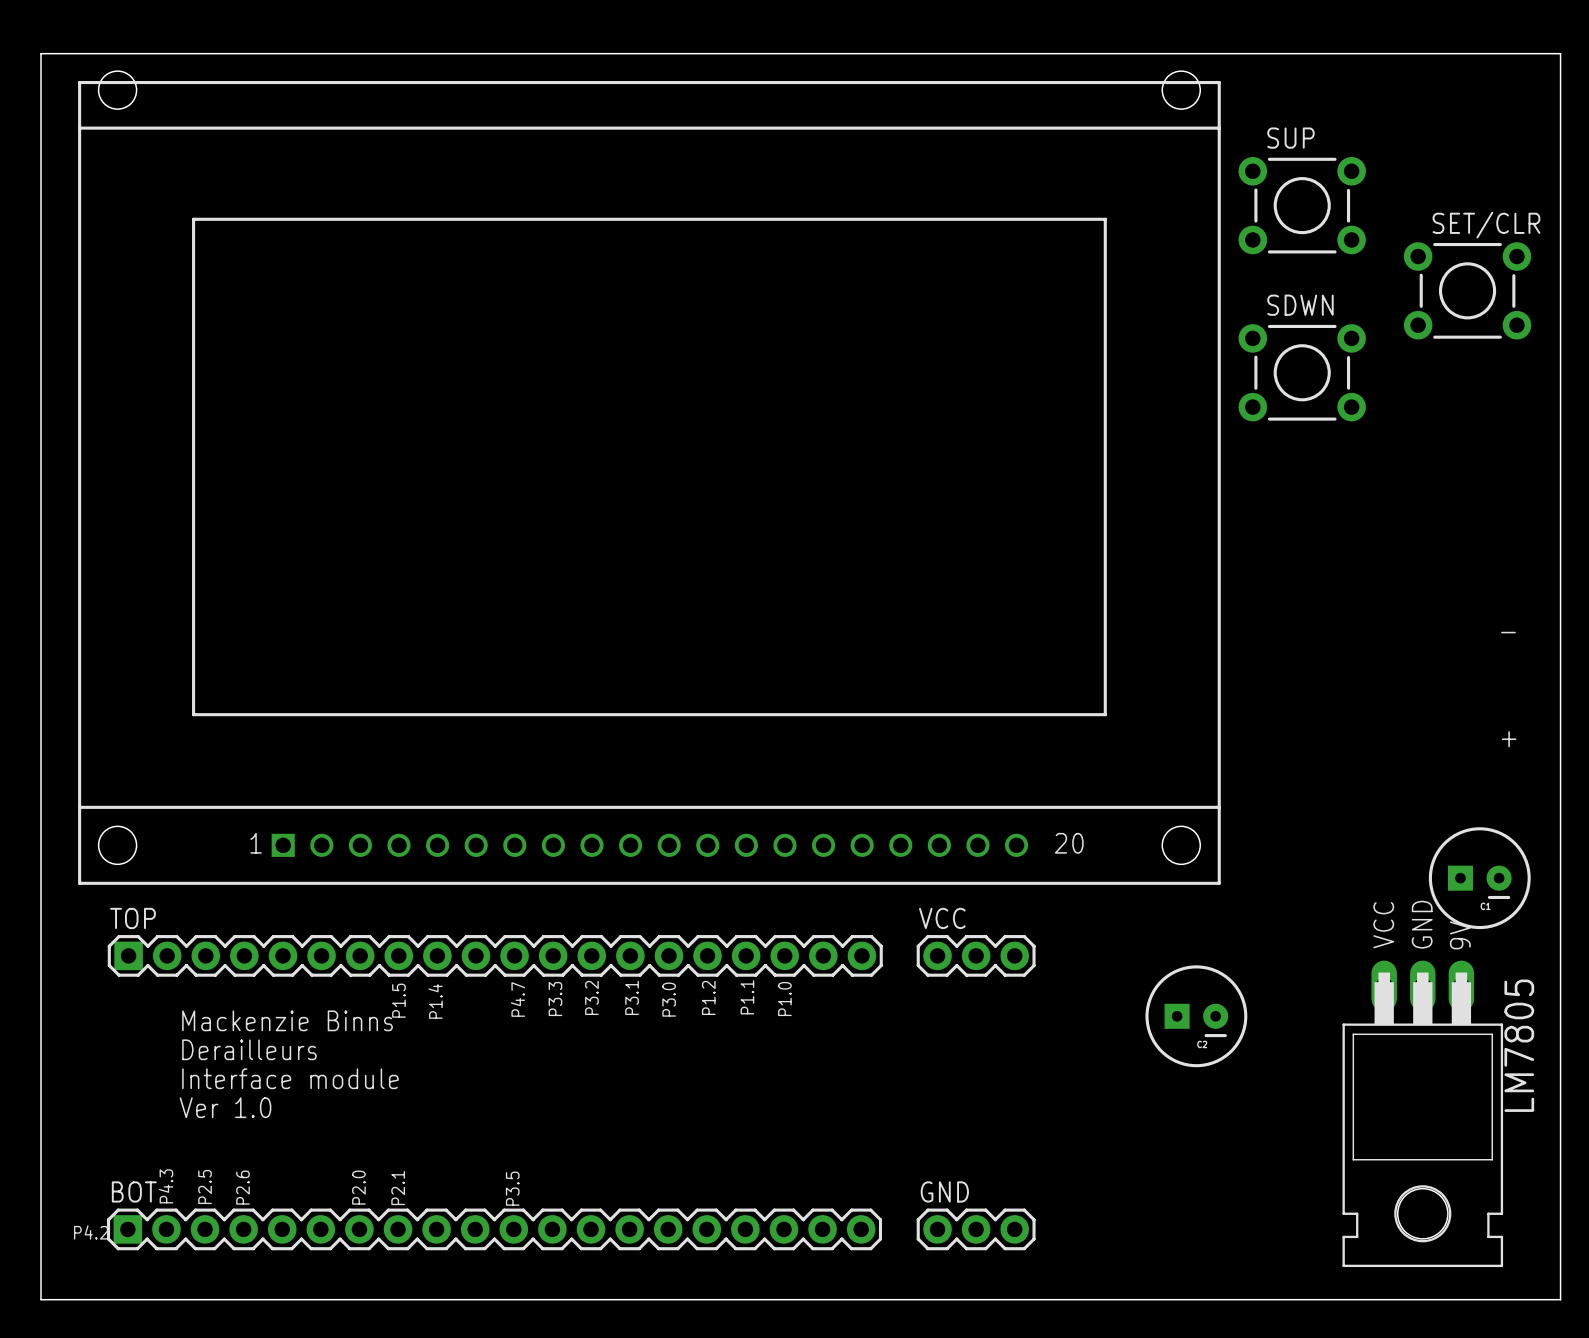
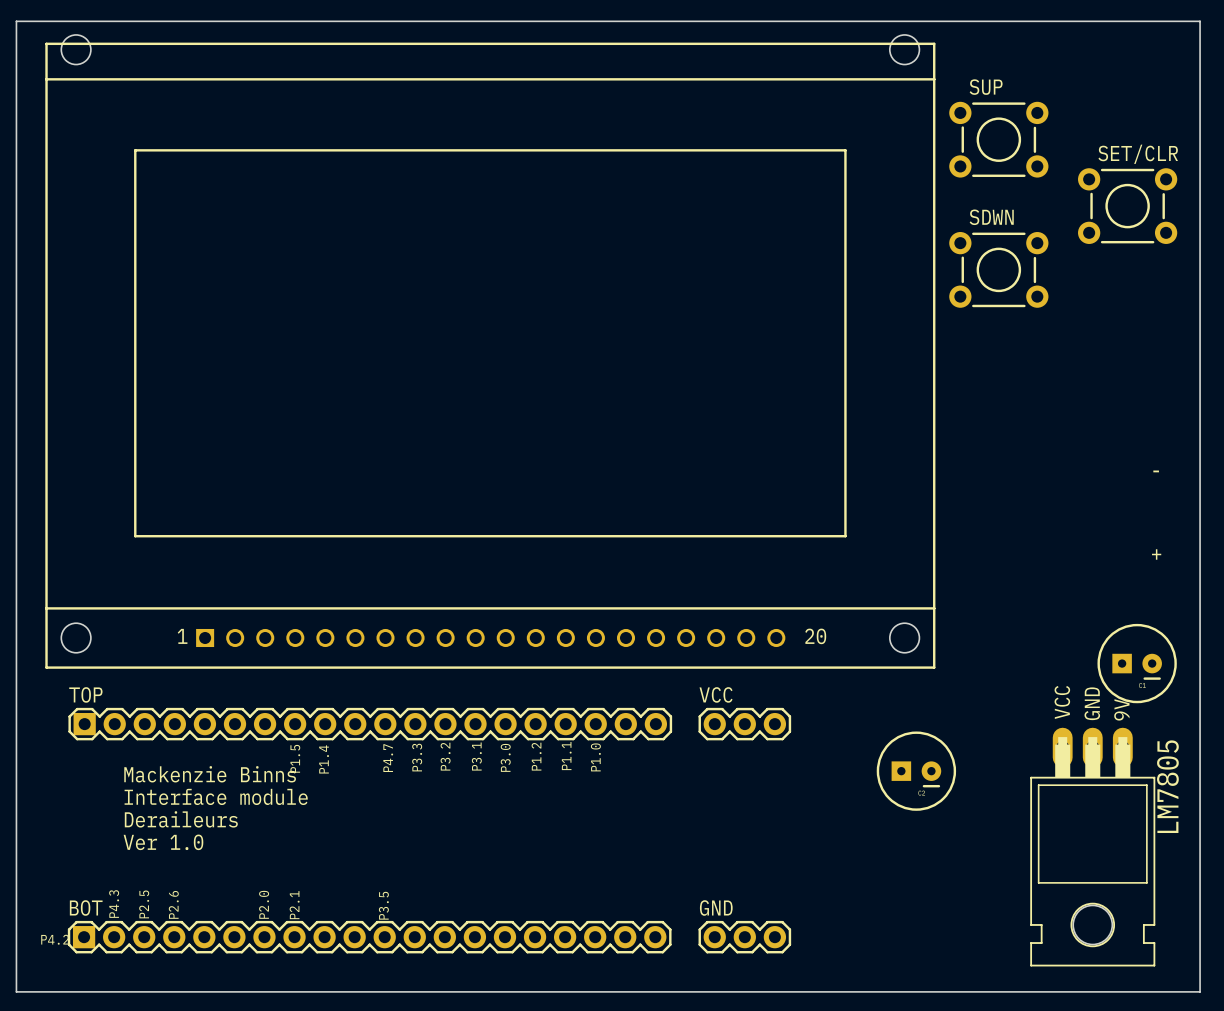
text: Derailleurs (249, 1049) -> Interface module (216, 796)
text: Interface module (290, 1078) -> Deraileurs (181, 819)

